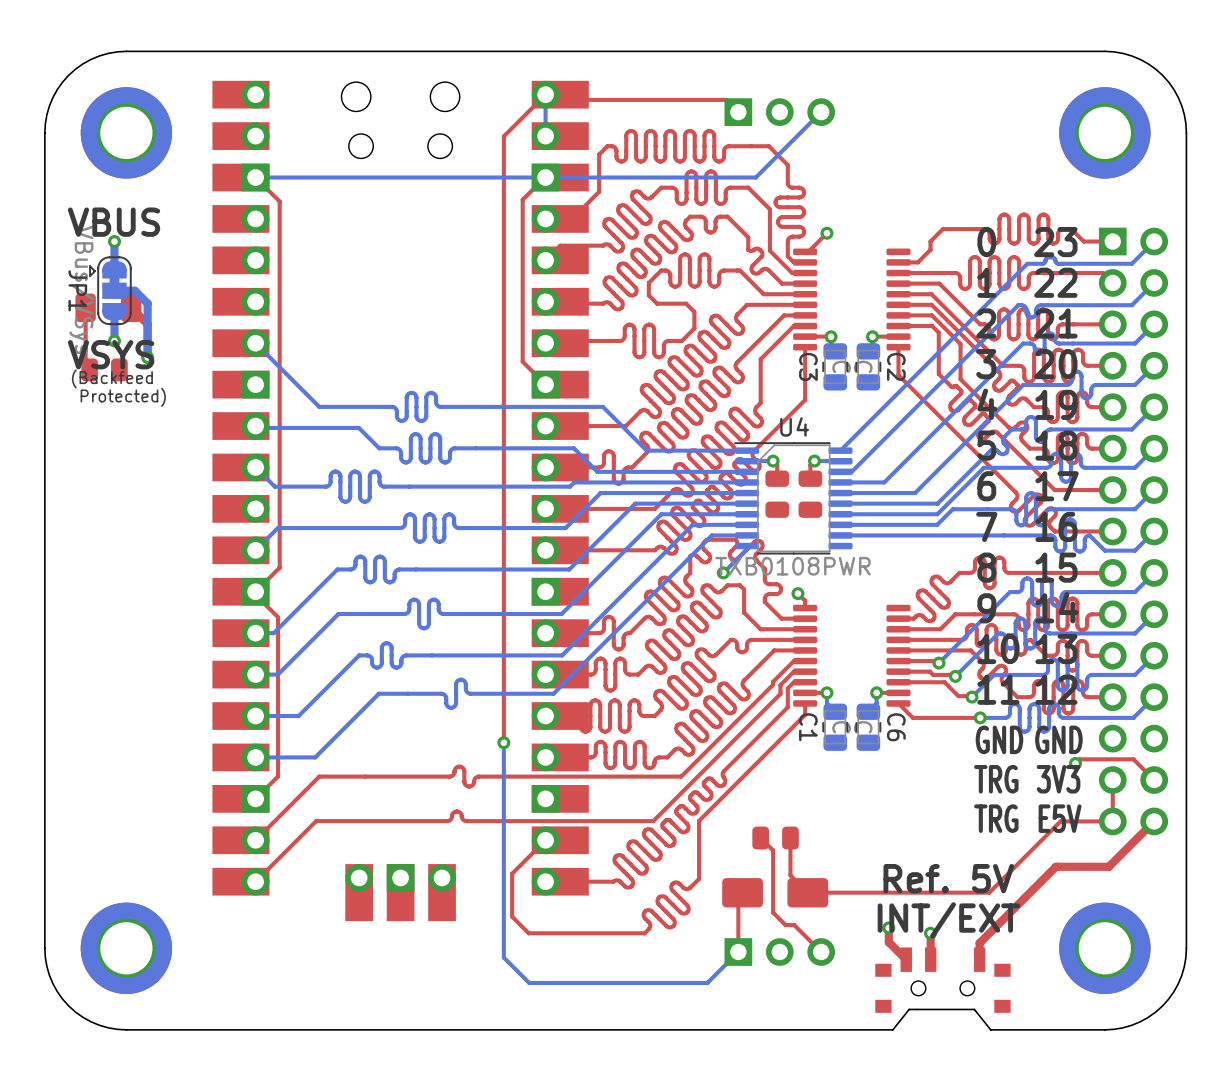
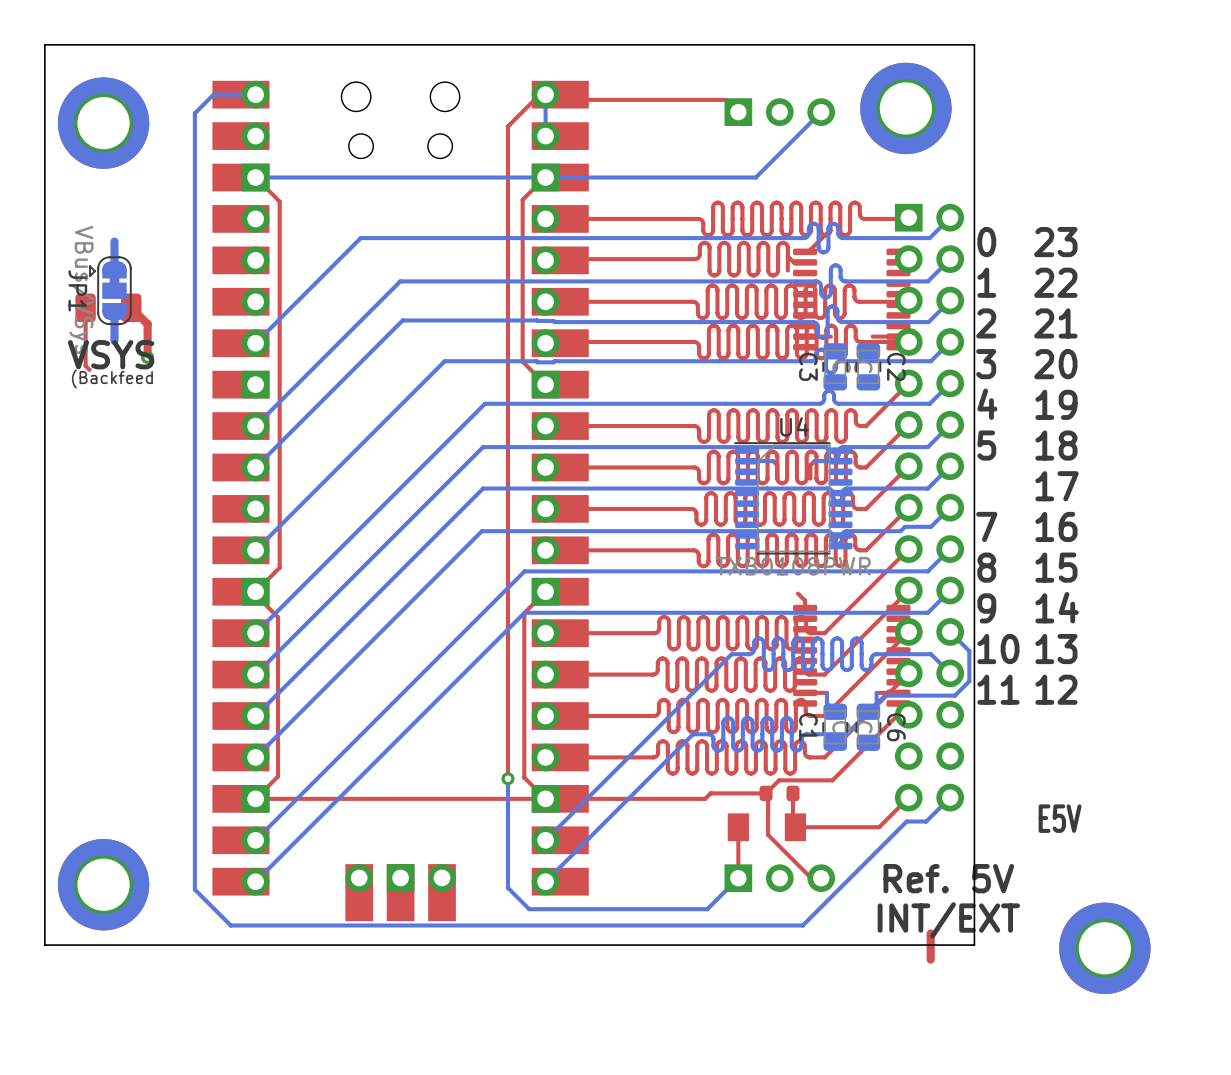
bottom track: none -> (255, 94) (213, 94) (194, 113) (194, 889) (230, 925) (802, 925) (906, 821) (926, 821) (950, 797)
top track: (545, 94) (503, 136) (503, 742) -> (545, 94) (539, 94) (508, 126) (508, 778)
board edge: (44, 132) (49, 105) (62, 82) (83, 63) (99, 55) (117, 51) (1104, 51) (1131, 55) (1155, 69) (1168, 82) (1178, 97) (1184, 114) (1186, 132) (1186, 948) (1184, 966) (1178, 983) (1162, 1005) (1140, 1021) (1114, 1029) (990, 1029) (974, 1009) (909, 1009) (892, 1029) (126, 1029) (108, 1027) (91, 1021) (68, 1005) (57, 991) (49, 975) (44, 945) -> (44, 132) (44, 44) (974, 44) (974, 945) (44, 945)
part position: (126, 132) -> (103, 123)
part position: (1104, 132) -> (905, 108)
top track: (572, 218) (599, 191) (599, 154) (607, 146) (612, 146) (616, 149) (617, 160) (621, 161) (625, 159) (626, 135) (628, 131) (632, 131) (635, 133) (636, 157) (640, 161) (645, 157) (647, 132) (651, 131) (655, 133) (655, 157) (660, 161) (665, 157) (665, 133) (669, 131) (672, 131) (675, 135) (675, 157) (680, 161) (684, 157) (685, 133) (691, 131) (694, 135) (694, 157) (699, 161) (704, 157) (704, 133) (710, 131) (714, 134) (714, 157) (717, 161) (723, 159) (724, 149) (727, 146) (768, 146) (787, 165) (788, 185) (791, 187) (801, 188) (804, 192) (800, 197) (779, 197) (775, 201) (778, 206) (799, 207) (803, 210) (801, 216) (782, 217) (778, 220) (781, 226) (799, 226) (803, 229) (801, 235) (789, 238) (787, 247) -> (572, 218) (699, 218) (702, 221) (703, 232) (708, 235) (713, 230) (713, 206) (718, 202) (722, 206) (723, 231) (728, 235) (732, 230) (732, 206) (738, 202) (742, 206) (742, 231) (747, 235) (752, 230) (752, 206) (757, 202) (761, 206) (762, 231) (767, 235) (771, 230) (771, 206) (777, 202) (781, 206) (781, 231) (787, 235) (791, 230) (791, 206) (796, 202) (801, 206) (801, 231) (806, 235) (810, 230) (811, 206) (815, 202) (820, 206) (820, 230) (825, 235) (830, 230) (830, 206) (835, 202) (840, 206) (840, 231) (845, 235) (849, 231) (850, 206) (853, 202) (859, 205) (860, 215) (863, 218) (908, 217)
text: VBUS (114, 222) -> none
via: (826, 233) -> none
via: (114, 241) -> none
top track: (1112, 241) (1083, 241) (1071, 229) (1063, 229) (1058, 232) (1057, 241) (1051, 243) (1048, 239) (1048, 218) (1043, 214) (1038, 218) (1038, 240) (1032, 243) (1028, 239) (1028, 218) (1023, 214) (1019, 218) (1018, 240) (1012, 243) (1009, 239) (1009, 218) (1003, 214) (999, 218) (999, 239) (996, 243) (990, 241) (989, 232) (986, 229) (942, 229) (930, 241) (930, 249) (917, 262) (898, 262) -> none
bottom track: (1154, 241) (1131, 263) (1058, 263) (1052, 257) (1047, 257) (1043, 263) (1027, 263) (840, 450) -> none
top track: (546, 259) (560, 245) (607, 244) (616, 251) (620, 251) (622, 244) (604, 226) (605, 220) (611, 219) (632, 237) (635, 236) (636, 231) (618, 212) (619, 206) (625, 205) (643, 223) (648, 223) (650, 220) (649, 216) (632, 198) (633, 192) (638, 191) (648, 198) (661, 187) (673, 187) (676, 191) (677, 201) (683, 203) (686, 199) (686, 175) (692, 171) (696, 175) (696, 200) (702, 203) (706, 199) (706, 175) (711, 171) (715, 175) (715, 199) (718, 203) (725, 201) (725, 191) (728, 188) (748, 187) (769, 209) (769, 250) (792, 273) (805, 273) -> (546, 259) (695, 259) (699, 256) (700, 245) (705, 242) (709, 247) (709, 271) (715, 275) (719, 271) (719, 246) (724, 242) (729, 247) (729, 271) (734, 275) (738, 271) (739, 246) (744, 242) (748, 247) (748, 271) (754, 275) (758, 271) (758, 246) (764, 242) (768, 247) (768, 271) (773, 275) (778, 271) (778, 245) (784, 243) (787, 247)
top track: (898, 273) (956, 273) (960, 276) (960, 286) (966, 288) (970, 284) (970, 260) (975, 257) (979, 261) (979, 285) (985, 288) (989, 284) (989, 260) (995, 257) (999, 261) (999, 285) (1004, 288) (1009, 284) (1009, 260) (1014, 257) (1018, 260) (1019, 284) (1022, 288) (1027, 287) (1029, 276) (1033, 273) (1102, 273) (1112, 282) -> none
bottom track: (1154, 282) (1131, 305) (1040, 305) (1036, 307) (1035, 315) (1031, 317) (1027, 314) (1025, 306) (1018, 305) (851, 471) (840, 471) -> none
top track: (805, 283) (782, 283) (766, 268) (757, 273) (753, 272) (751, 266) (761, 256) (762, 252) (757, 248) (751, 250) (748, 249) (748, 237) (727, 216) (716, 218) (715, 229) (710, 232) (706, 229) (703, 217) (690, 216) (684, 223) (691, 234) (688, 240) (684, 239) (667, 222) (663, 222) (660, 224) (660, 229) (675, 245) (673, 251) (668, 251) (653, 236) (646, 237) (646, 243) (659, 256) (658, 263) (652, 263) (639, 250) (633, 251) (632, 257) (645, 270) (643, 276) (638, 276) (625, 263) (619, 265) (619, 271) (636, 288) (634, 294) (628, 294) (611, 277) (605, 279) (605, 285) (622, 302) (620, 308) (615, 308) (607, 302) (547, 303) (545, 301) -> (908, 300) (858, 301) (854, 298) (853, 287) (848, 285) (844, 289) (844, 314) (839, 318) (835, 314) (834, 289) (830, 285) (825, 289) (825, 313) (820, 318) (815, 313) (815, 289) (810, 285) (805, 289) (805, 313) (800, 318) (795, 314) (795, 289) (790, 285) (786, 289) (785, 313) (781, 318) (776, 314) (776, 289) (771, 285) (766, 289) (766, 313) (762, 318) (756, 314) (756, 289) (752, 285) (747, 289) (746, 313) (742, 318) (737, 314) (737, 289) (732, 285) (727, 289) (727, 313) (723, 318) (717, 314) (717, 289) (713, 285) (707, 289) (707, 313) (703, 318) (698, 315) (697, 304) (693, 301) (545, 301)
top track: (898, 283) (939, 283) (980, 324) (987, 325) (989, 336) (993, 339) (998, 335) (999, 313) (1003, 309) (1008, 312) (1008, 335) (1013, 339) (1018, 335) (1018, 313) (1022, 309) (1028, 312) (1028, 335) (1032, 339) (1038, 335) (1038, 313) (1042, 309) (1047, 312) (1048, 335) (1051, 339) (1057, 336) (1058, 327) (1061, 324) (1112, 324) -> none
bottom track: (114, 290) (134, 290) (147, 303) (147, 357) -> none
top track: (805, 294) (763, 294) (739, 270) (721, 271) (719, 274) (718, 284) (712, 286) (709, 282) (709, 258) (705, 254) (699, 258) (699, 283) (693, 286) (689, 282) (689, 258) (684, 254) (680, 258) (680, 282) (678, 285) (671, 284) (669, 273) (666, 270) (661, 270) (648, 282) (648, 295) (657, 303) (686, 303) (694, 311) (694, 328) (681, 340) (665, 341) (661, 356) (657, 357) (654, 354) (654, 328) (649, 324) (644, 328) (644, 352) (640, 357) (634, 353) (634, 328) (630, 324) (625, 327) (624, 337) (621, 340) (546, 341) -> (908, 341) (859, 341) (855, 338) (855, 328) (850, 325) (846, 329) (845, 354) (841, 358) (836, 354) (835, 329) (831, 325) (826, 329) (826, 354) (821, 358) (816, 354) (816, 329) (811, 325) (806, 329) (806, 354) (801, 358) (797, 354) (796, 329) (792, 325) (787, 329) (787, 354) (782, 358) (777, 354) (777, 329) (773, 325) (767, 329) (767, 354) (763, 358) (758, 354) (757, 329) (753, 325) (748, 329) (748, 354) (743, 358) (738, 354) (738, 329) (734, 325) (728, 329) (728, 354) (724, 358) (718, 354) (718, 329) (714, 325) (709, 329) (708, 354) (704, 358) (699, 355) (698, 345) (694, 342) (546, 341)
top track: (898, 294) (931, 294) (1003, 365) (1022, 367) (1024, 378) (1027, 381) (1033, 378) (1034, 353) (1038, 349) (1043, 353) (1043, 377) (1047, 381) (1053, 378) (1053, 353) (1057, 349) (1063, 353) (1063, 377) (1067, 381) (1073, 378) (1073, 353) (1076, 350) (1082, 352) (1083, 362) (1086, 365) (1112, 365) -> none
top track: (805, 304) (747, 304) (736, 316) (743, 328) (738, 334) (735, 333) (718, 316) (713, 316) (711, 322) (728, 340) (728, 346) (722, 347) (706, 332) (701, 332) (699, 338) (714, 354) (714, 359) (708, 361) (693, 346) (687, 346) (686, 353) (701, 369) (700, 373) (696, 375) (676, 357) (671, 358) (669, 364) (686, 381) (687, 387) (680, 388) (663, 372) (657, 371) (656, 377) (672, 395) (673, 401) (667, 402) (649, 385) (644, 385) (642, 391) (659, 409) (659, 414) (654, 417) (646, 410) (642, 410) (625, 426) -> (908, 383) (866, 426) (857, 425) (854, 412) (847, 411) (846, 414) (845, 438) (841, 441) (836, 438) (836, 414) (831, 410) (826, 413) (826, 437) (822, 441) (816, 438) (816, 414) (812, 410) (807, 413) (806, 437) (802, 441) (797, 438) (797, 414) (792, 410) (787, 413) (787, 437) (783, 441) (777, 438) (777, 414) (773, 410) (767, 413) (767, 437) (763, 441) (758, 438) (757, 414) (753, 410) (748, 413) (748, 437) (743, 441) (738, 438) (738, 414) (734, 410) (728, 413) (728, 437) (724, 441) (718, 438) (718, 414) (714, 410) (709, 413) (708, 437) (704, 441) (699, 439) (699, 429) (695, 426) (625, 426)
top track: (898, 304) (931, 304) (999, 372) (999, 377) (994, 384) (995, 389) (1001, 390) (1011, 380) (1017, 385) (1017, 387) (1008, 398) (1010, 404) (1014, 404) (1021, 398) (1025, 398) (1034, 407) (1046, 408) (1048, 419) (1052, 422) (1057, 418) (1057, 396) (1061, 392) (1067, 395) (1067, 417) (1071, 421) (1077, 418) (1077, 396) (1080, 392) (1086, 394) (1087, 403) (1090, 406) (1112, 407) -> none
top track: (805, 315) (784, 315) (737, 362) (736, 368) (742, 376) (740, 381) (735, 381) (721, 367) (716, 368) (714, 374) (728, 388) (728, 394) (722, 395) (707, 382) (702, 382) (700, 388) (714, 402) (714, 408) (708, 409) (694, 395) (688, 396) (687, 402) (700, 416) (700, 422) (694, 423) (680, 409) (675, 409) (673, 416) (686, 430) (686, 435) (680, 437) (666, 423) (660, 423) (659, 430) (673, 445) (672, 450) (668, 451) (649, 433) (643, 433) (641, 438) (647, 446) (648, 450) (632, 467) -> (908, 424) (866, 467) (857, 466) (854, 453) (847, 452) (845, 455) (845, 479) (841, 483) (836, 479) (835, 455) (831, 451) (826, 455) (826, 479) (822, 483) (816, 479) (816, 455) (812, 451) (806, 455) (806, 479) (802, 483) (797, 479) (796, 455) (792, 451) (787, 455) (787, 479) (782, 483) (777, 479) (777, 455) (773, 451) (767, 455) (767, 479) (763, 483) (757, 479) (757, 455) (753, 451) (748, 455) (747, 479) (743, 483) (738, 479) (738, 455) (733, 451) (728, 455) (728, 479) (724, 483) (718, 479) (718, 455) (714, 451) (709, 455) (708, 479) (704, 483) (699, 480) (698, 471) (695, 467) (632, 467)
top track: (898, 315) (931, 315) (960, 344) (960, 379) (1009, 427) (1014, 428) (1021, 422) (1025, 423) (1027, 428) (1021, 435) (1021, 440) (1029, 448) (1046, 449) (1050, 462) (1054, 463) (1057, 460) (1057, 438) (1061, 434) (1067, 437) (1067, 459) (1071, 463) (1077, 459) (1077, 438) (1080, 434) (1086, 435) (1087, 445) (1090, 448) (1112, 448) -> none
bottom track: (1154, 324) (1135, 343) (1058, 343) (1055, 341) (1052, 334) (1049, 333) (1044, 336) (1044, 349) (1041, 353) (1036, 352) (1032, 344) (1023, 343) (884, 482) (840, 482) -> none
top track: (805, 326) (793, 326) (760, 359) (760, 403) (755, 410) (761, 419) (760, 424) (755, 426) (738, 409) (732, 409) (730, 415) (747, 432) (747, 438) (741, 439) (724, 423) (718, 423) (717, 429) (733, 446) (733, 452) (727, 453) (710, 437) (704, 437) (703, 443) (719, 460) (719, 465) (713, 467) (696, 451) (691, 450) (689, 457) (705, 473) (705, 479) (699, 481) (682, 464) (677, 464) (675, 471) (691, 487) (692, 492) (686, 495) (679, 489) (674, 489) (654, 508) -> (908, 466) (866, 508) (854, 507) (851, 495) (845, 494) (843, 497) (843, 521) (838, 524) (833, 521) (833, 497) (829, 493) (823, 496) (823, 520) (819, 524) (814, 521) (813, 497) (809, 493) (804, 496) (804, 520) (799, 524) (794, 521) (794, 497) (790, 493) (784, 496) (784, 520) (780, 524) (774, 521) (774, 497) (770, 493) (765, 496) (764, 520) (760, 524) (755, 521) (755, 497) (750, 493) (745, 496) (745, 520) (741, 524) (735, 521) (735, 497) (731, 493) (725, 496) (725, 520) (722, 524) (716, 521) (715, 497) (712, 493) (706, 496) (706, 520) (702, 524) (697, 522) (696, 512) (692, 509) (654, 508)
top track: (898, 326) (932, 326) (938, 332) (938, 374) (951, 386) (956, 386) (961, 391) (950, 403) (950, 407) (953, 410) (957, 410) (969, 399) (975, 406) (964, 417) (965, 423) (971, 424) (982, 413) (988, 418) (988, 420) (978, 431) (979, 437) (984, 438) (992, 431) (996, 432) (1054, 490) (1112, 490) -> none
via: (831, 336) -> none
via: (872, 336) -> none
via: (114, 340) -> none
bottom track: (255, 343) (319, 406) (392, 406) (396, 409) (397, 418) (401, 420) (406, 417) (406, 397) (410, 392) (416, 395) (416, 416) (420, 420) (425, 417) (426, 397) (430, 392) (435, 394) (436, 403) (440, 406) (602, 406) (646, 450) (747, 450) -> (255, 343) (360, 238) (803, 238) (808, 235) (809, 225) (813, 223) (818, 227) (819, 249) (823, 252) (828, 248) (828, 228) (832, 223) (837, 225) (838, 235) (842, 238) (929, 238) (950, 217)
top track: (805, 347) (805, 400) (753, 452) (753, 456) (759, 464) (758, 468) (752, 470) (741, 459) (738, 459) (734, 465) (745, 477) (744, 483) (738, 484) (725, 472) (720, 479) (731, 490) (730, 497) (724, 497) (712, 486) (706, 491) (717, 505) (716, 510) (710, 511) (698, 500) (692, 505) (703, 519) (701, 525) (696, 525) (679, 508) (673, 508) (672, 515) (689, 532) (690, 537) (683, 539) (666, 522) (661, 521) (658, 524) (658, 528) (675, 545) (676, 550) (671, 553) (661, 546) (654, 550) -> (908, 507) (866, 550) (857, 549) (854, 536) (847, 535) (845, 538) (845, 562) (841, 566) (835, 562) (835, 538) (831, 534) (826, 538) (825, 561) (821, 566) (816, 562) (816, 538) (811, 534) (806, 538) (806, 561) (802, 566) (796, 562) (796, 538) (792, 534) (786, 538) (786, 561) (782, 566) (777, 562) (776, 538) (772, 534) (767, 538) (767, 561) (762, 566) (757, 562) (757, 538) (753, 534) (747, 538) (747, 561) (743, 566) (738, 562) (737, 538) (733, 534) (728, 538) (728, 561) (724, 565) (718, 562) (718, 538) (714, 534) (708, 538) (708, 561) (704, 565) (699, 563) (698, 553) (695, 550) (654, 550)
top track: (898, 347) (898, 375) (1016, 493) (1016, 498) (1010, 505) (1012, 510) (1018, 511) (1035, 494) (1041, 496) (1041, 501) (1025, 518) (1026, 524) (1032, 524) (1047, 509) (1051, 508) (1055, 513) (1049, 524) (1054, 531) (1112, 531) -> none
bottom track: (1154, 365) (1135, 384) (1094, 385) (1091, 387) (1090, 395) (1087, 398) (1081, 395) (1081, 375) (1077, 371) (1072, 373) (1071, 381) (1068, 384) (1023, 384) (915, 493) (840, 493) -> none
part: (104, 369) -> none
text: Protected) (123, 397) -> none
bottom track: (1154, 407) (1131, 429) (1050, 429) (1046, 431) (1045, 439) (1041, 441) (1036, 438) (1035, 419) (1029, 417) (1024, 428) (1011, 429) (1003, 437) (1003, 442) (1007, 448) (1006, 452) (1002, 454) (995, 449) (990, 450) (937, 503) (840, 503) -> none
bottom track: (255, 426) (257, 427) (358, 427) (379, 448) (399, 449) (401, 459) (405, 462) (410, 459) (411, 437) (415, 434) (420, 437) (420, 459) (424, 462) (428, 461) (430, 437) (435, 434) (440, 437) (440, 458) (444, 462) (448, 460) (450, 451) (454, 448) (573, 448) (597, 471) (747, 471) -> (255, 426) (400, 281) (816, 281) (820, 283) (821, 294) (825, 297) (830, 293) (830, 269) (834, 265) (839, 267) (840, 278) (844, 281) (927, 281) (950, 259)
bottom track: (1154, 448) (1135, 467) (1084, 467) (1081, 464) (1079, 455) (1073, 454) (1071, 458) (1070, 478) (1066, 481) (1061, 478) (1061, 458) (1056, 453) (1052, 455) (1051, 464) (1047, 467) (983, 467) (937, 514) (840, 514) -> none
via: (773, 461) -> none
via: (814, 461) -> none
bottom track: (255, 467) (274, 486) (327, 486) (330, 483) (331, 473) (337, 471) (340, 475) (340, 498) (345, 501) (350, 497) (350, 475) (355, 471) (359, 475) (360, 497) (364, 501) (369, 498) (369, 475) (374, 471) (378, 473) (379, 483) (384, 486) (570, 486) (574, 482) (747, 482) -> (255, 467) (402, 320) (812, 322) (817, 324) (818, 334) (822, 337) (827, 334) (827, 310) (831, 306) (836, 308) (837, 319) (841, 322) (928, 322) (950, 300)
top track: (628, 467) (624, 469) (623, 480) (618, 483) (613, 480) (613, 455) (611, 452) (605, 453) (603, 464) (599, 467) -> (628, 467) (599, 467)
text: 6 (986, 486) -> none
bottom track: (1154, 490) (1135, 509) (1049, 509) (1045, 512) (1045, 522) (1041, 525) (1036, 521) (1035, 497) (1031, 493) (1026, 496) (1026, 521) (1021, 525) (1017, 522) (1016, 512) (1011, 509) (952, 509) (937, 524) (840, 524) -> none
bottom track: (747, 493) (600, 493) (565, 528) (458, 528) (454, 525) (453, 516) (448, 514) (444, 518) (444, 538) (440, 541) (434, 538) (434, 518) (430, 514) (425, 517) (424, 537) (420, 541) (415, 538) (414, 518) (410, 514) (406, 516) (404, 525) (400, 528) (277, 528) -> (950, 341) (930, 361) (840, 361) (836, 363) (834, 370) (830, 372) (826, 369) (825, 352) (821, 349) (817, 351) (815, 358) (811, 361) (444, 361) (277, 528)
part: (777, 494) -> none
part: (810, 494) -> none
bottom track: (747, 503) (635, 503) (569, 569) (398, 569) (395, 572) (393, 580) (389, 582) (385, 578) (384, 559) (379, 556) (375, 560) (374, 579) (370, 582) (365, 578) (364, 559) (359, 556) (355, 559) (354, 568) (337, 569) (273, 633) (255, 633) -> (950, 383) (929, 403) (838, 403) (834, 400) (832, 392) (829, 390) (825, 392) (823, 401) (819, 403) (485, 403) (255, 633)
bottom track: (747, 514) (661, 514) (561, 614) (442, 613) (439, 610) (438, 602) (433, 599) (429, 603) (428, 624) (424, 628) (419, 625) (419, 603) (414, 599) (410, 601) (408, 610) (405, 613) (338, 614) (277, 674) (255, 674) -> (950, 424) (927, 447) (842, 447) (838, 450) (837, 458) (833, 459) (829, 457) (827, 449) (823, 447) (483, 447) (255, 674)
bottom track: (747, 524) (692, 524) (562, 655) (405, 655) (402, 657) (400, 665) (395, 667) (391, 664) (391, 646) (386, 643) (382, 646) (381, 663) (379, 666) (373, 666) (369, 656) (359, 655) (298, 716) (255, 716) -> (950, 466) (927, 488) (846, 488) (842, 491) (841, 499) (837, 501) (833, 499) (831, 490) (827, 488) (483, 488) (255, 716)
part position: (1133, 531) -> (929, 507)
bottom track: (1154, 531) (1135, 550) (1104, 550) (1089, 535) (1085, 538) (1084, 549) (1079, 551) (1075, 547) (1074, 523) (1070, 519) (1065, 522) (1065, 547) (1060, 551) (1056, 549) (1055, 538) (1051, 535) (840, 535) -> none
bottom track: (747, 535) (711, 535) (553, 693) (470, 693) (466, 690) (464, 681) (460, 679) (456, 683) (455, 704) (451, 707) (446, 705) (445, 696) (442, 693) (378, 693) (315, 757) (255, 757) -> (950, 507) (931, 526) (905, 526) (900, 531) (846, 531) (842, 534) (840, 542) (837, 544) (832, 541) (831, 533) (827, 531) (481, 531) (255, 757)
bottom track: (747, 546) (747, 549) (723, 572) -> none
bottom track: none -> (950, 549) (927, 571) (524, 571) (255, 840)
via: (723, 572) -> none
top track: (1112, 572) (1008, 572) (1004, 569) (1003, 560) (998, 557) (994, 561) (994, 584) (989, 588) (984, 583) (984, 560) (978, 557) (975, 560) (974, 569) (971, 572) (959, 572) (947, 583) (937, 576) (932, 578) (932, 584) (948, 600) (946, 607) (941, 606) (924, 590) (918, 592) (918, 597) (934, 614) (932, 620) (928, 620) (919, 614) (913, 618) (898, 618) -> none
bottom track: (1154, 572) (1135, 592) (1065, 592) (1061, 595) (1060, 603) (1056, 605) (1051, 602) (1051, 582) (1049, 579) (1045, 578) (1042, 581) (1041, 602) (1037, 605) (1032, 602) (1031, 581) (1025, 578) (1022, 581) (1020, 590) (1009, 592) (938, 663) -> none
bottom track: none -> (950, 590) (927, 612) (524, 612) (255, 881)
top track: none -> (545, 591) (524, 613) (524, 777) (545, 798)
via: (797, 593) -> none
top track: (1112, 614) (1090, 614) (1087, 617) (1086, 627) (1080, 629) (1077, 625) (1077, 602) (1071, 598) (1067, 602) (1067, 626) (1061, 629) (1057, 625) (1057, 602) (1051, 598) (1048, 602) (1047, 626) (1042, 630) (1038, 625) (1038, 602) (1032, 598) (1028, 602) (1028, 625) (1024, 629) (1019, 628) (1018, 617) (1013, 614) (955, 614) (940, 629) (898, 629) -> none
bottom track: (1154, 614) (1135, 633) (1049, 633) (1045, 630) (1043, 620) (1038, 618) (1035, 622) (1035, 644) (1030, 648) (1025, 644) (1025, 621) (1019, 618) (1015, 622) (1014, 647) (1007, 647) (1004, 635) (998, 633) (955, 676) -> none
top track: (805, 618) (781, 618) (764, 601) (766, 595) (778, 593) (781, 588) (778, 584) (768, 584) (765, 581) (764, 568) (755, 557) (762, 547) (760, 541) (755, 541) (734, 559) (730, 557) (729, 554) (736, 545) (735, 539) (706, 539) (702, 546) (709, 555) (708, 560) (703, 561) (694, 555) (690, 556) (690, 572) (685, 580) (692, 589) (691, 594) (685, 595) (667, 578) (661, 578) (660, 584) (677, 602) (678, 607) (671, 609) (653, 592) (648, 591) (646, 598) (663, 616) (664, 621) (658, 624) (651, 617) (646, 617) (630, 633) -> (908, 549) (824, 633) (808, 632) (805, 618) (798, 618) (796, 621) (796, 645) (792, 649) (786, 645) (786, 621) (782, 617) (776, 620) (776, 645) (772, 649) (767, 645) (766, 621) (762, 617) (757, 620) (757, 645) (752, 649) (747, 645) (747, 621) (743, 617) (737, 620) (737, 645) (733, 649) (727, 645) (727, 621) (723, 617) (718, 620) (717, 645) (713, 649) (708, 645) (708, 621) (703, 617) (698, 620) (698, 645) (694, 649) (688, 645) (688, 621) (684, 617) (678, 620) (678, 645) (675, 649) (669, 645) (669, 621) (666, 617) (659, 619) (659, 629) (656, 632) (630, 633)
top track: (805, 629) (760, 629) (744, 612) (744, 589) (739, 585) (727, 585) (718, 592) (706, 585) (702, 587) (702, 592) (719, 609) (719, 615) (713, 617) (699, 603) (693, 603) (692, 609) (706, 623) (705, 629) (699, 630) (685, 617) (680, 617) (678, 623) (692, 637) (692, 643) (686, 644) (671, 630) (666, 630) (664, 637) (678, 651) (678, 656) (672, 658) (654, 641) (649, 640) (647, 647) (664, 664) (665, 669) (659, 672) (648, 665) (638, 674) -> (908, 590) (824, 674) (807, 673) (803, 660) (796, 659) (794, 662) (794, 686) (791, 690) (785, 687) (784, 662) (780, 658) (775, 662) (775, 686) (770, 690) (765, 687) (765, 662) (761, 658) (755, 662) (755, 686) (751, 690) (746, 687) (745, 662) (741, 658) (736, 662) (736, 686) (731, 690) (726, 687) (726, 662) (722, 658) (716, 662) (716, 686) (712, 690) (706, 687) (706, 662) (703, 658) (697, 662) (696, 686) (693, 690) (687, 687) (687, 662) (683, 658) (677, 662) (677, 686) (674, 690) (670, 690) (667, 687) (667, 662) (664, 658) (658, 660) (657, 670) (655, 673) (638, 674)
bottom track: none -> (950, 631) (969, 651) (969, 681) (955, 695) (885, 695) (846, 734) (805, 734) (801, 737) (801, 747) (797, 750) (791, 746) (791, 722) (788, 718) (782, 721) (781, 746) (777, 750) (772, 746) (770, 719) (766, 718) (762, 721) (762, 746) (757, 750) (752, 746) (752, 721) (748, 718) (745, 718) (742, 722) (742, 746) (737, 750) (733, 746) (732, 721) (726, 718) (723, 722) (721, 749) (718, 750) (714, 748) (711, 734) (693, 734) (545, 881)
top track: (628, 633) (623, 636) (622, 647) (618, 649) (613, 645) (613, 621) (611, 617) (605, 618) (603, 630) (599, 633) -> (628, 633) (599, 633)
top track: (805, 639) (751, 639) (747, 642) (746, 650) (742, 652) (737, 649) (735, 641) (731, 639) (713, 656) (703, 649) (699, 649) (696, 652) (697, 656) (713, 673) (713, 678) (707, 680) (690, 664) (685, 663) (683, 670) (699, 687) (700, 692) (693, 694) (676, 677) (671, 677) (669, 684) (685, 700) (686, 706) (680, 708) (662, 691) (658, 690) (655, 696) (661, 707) (654, 716) -> (908, 631) (824, 716) (808, 715) (804, 701) (797, 700) (795, 704) (795, 727) (792, 731) (786, 728) (786, 704) (781, 699) (776, 703) (776, 727) (772, 732) (766, 728) (766, 704) (762, 699) (756, 703) (756, 727) (752, 732) (747, 728) (746, 704) (742, 699) (737, 703) (737, 727) (732, 732) (727, 728) (727, 704) (723, 700) (717, 703) (717, 727) (714, 731) (708, 728) (707, 704) (704, 700) (698, 703) (698, 727) (694, 731) (688, 728) (688, 704) (685, 700) (681, 700) (678, 703) (678, 727) (676, 731) (671, 731) (668, 728) (668, 704) (666, 700) (659, 701) (658, 712) (654, 716)
top track: (898, 639) (963, 639) (966, 636) (967, 627) (972, 625) (976, 628) (977, 644) (983, 646) (986, 643) (986, 628) (992, 625) (996, 628) (996, 650) (999, 654) (1005, 651) (1006, 636) (1013, 635) (1015, 637) (1016, 651) (1020, 654) (1025, 652) (1026, 642) (1029, 640) (1046, 655) (1055, 654) (1058, 642) (1065, 641) (1067, 645) (1067, 666) (1071, 670) (1077, 666) (1077, 645) (1080, 641) (1086, 642) (1087, 652) (1090, 655) (1112, 655) -> none
top track: (805, 650) (774, 650) (743, 681) (743, 686) (748, 694) (745, 699) (740, 698) (726, 684) (720, 684) (719, 690) (734, 705) (734, 709) (732, 712) (728, 713) (712, 697) (706, 698) (705, 704) (720, 720) (720, 724) (716, 727) (713, 726) (698, 711) (692, 712) (691, 717) (706, 733) (705, 739) (699, 740) (683, 724) (676, 726) (677, 731) (693, 747) (690, 754) (687, 754) (680, 749) (676, 748) (667, 757) (656, 758) (653, 766) (648, 767) (644, 763) (644, 744) (638, 742) (634, 746) (634, 765) (629, 768) (625, 764) (624, 744) (619, 741) (615, 745) (614, 765) (609, 768) (605, 764) (605, 744) (600, 741) (596, 744) (595, 754) (590, 757) -> (908, 673) (824, 757) (807, 756) (803, 743) (797, 742) (795, 745) (795, 769) (791, 773) (785, 769) (785, 745) (781, 741) (775, 744) (775, 769) (771, 773) (765, 769) (765, 745) (761, 741) (756, 744) (755, 769) (751, 773) (746, 769) (746, 745) (741, 741) (736, 744) (736, 769) (732, 773) (726, 769) (726, 745) (722, 741) (716, 744) (716, 769) (712, 773) (707, 769) (707, 745) (702, 741) (697, 744) (697, 769) (693, 773) (687, 769) (687, 745) (683, 741) (677, 744) (677, 769) (673, 773) (668, 769) (667, 745) (663, 741) (658, 743) (657, 753) (654, 757) (590, 757)
top track: (898, 650) (970, 650) (983, 663) (979, 673) (981, 678) (986, 678) (999, 666) (1004, 667) (1006, 671) (1001, 677) (1002, 681) (1017, 697) (1031, 696) (1035, 682) (1041, 681) (1043, 685) (1043, 709) (1047, 713) (1053, 709) (1053, 685) (1057, 681) (1063, 684) (1063, 709) (1067, 713) (1073, 709) (1073, 685) (1076, 681) (1082, 683) (1083, 693) (1086, 696) (1112, 697) -> none
bottom track: (1154, 655) (1135, 674) (1090, 675) (1087, 678) (1086, 688) (1082, 690) (1077, 686) (1075, 660) (1071, 659) (1067, 662) (1067, 686) (1062, 690) (1057, 686) (1057, 662) (1051, 659) (1048, 662) (1047, 671) (1045, 674) (994, 674) (972, 697) -> none
top track: (805, 661) (793, 661) (773, 681) (773, 684) (681, 776) (479, 776) (474, 781) -> none
top track: (898, 661) (936, 661) (938, 663) -> none
via: (938, 663) -> none
top track: (805, 671) (793, 671) (780, 685) (780, 693) (653, 821) (466, 821) (457, 811) -> none
top track: (898, 671) (929, 671) (933, 674) (955, 676) -> none
bottom track: none -> (950, 673) (931, 654) (875, 654) (871, 657) (870, 668) (864, 669) (861, 665) (861, 641) (856, 638) (852, 641) (851, 665) (848, 669) (842, 667) (842, 642) (837, 638) (832, 641) (830, 668) (826, 670) (822, 667) (822, 642) (817, 638) (812, 642) (812, 667) (809, 669) (805, 669) (802, 665) (802, 641) (798, 638) (793, 642) (792, 667) (786, 669) (783, 665) (783, 641) (778, 638) (773, 642) (773, 666) (768, 670) (763, 665) (763, 641) (757, 638) (754, 641) (752, 652) (731, 654) (545, 840)
top track: (629, 674) (625, 671) (624, 661) (620, 658) (615, 662) (615, 686) (612, 689) (608, 690) (605, 686) (605, 662) (603, 659) (596, 660) (595, 671) (590, 674) -> (629, 674) (590, 674)
via: (955, 676) -> none
top track: (805, 682) (793, 682) (787, 688) (787, 707) (723, 771) (724, 784) -> none
top track: (898, 682) (944, 682) (958, 696) (972, 697) -> none
via: (826, 692) -> none
via: (876, 692) -> none
via: (972, 697) -> none
bottom track: (1154, 697) (1133, 717) (1063, 717) (1059, 714) (1057, 706) (1052, 704) (1049, 708) (1048, 728) (1044, 731) (1039, 728) (1039, 708) (1035, 704) (1029, 707) (1029, 727) (1025, 731) (1020, 728) (1019, 708) (1016, 704) (1010, 706) (1009, 714) (1006, 717) (980, 717) -> none
top track: (805, 703) (805, 714) (699, 820) (699, 878) (687, 888) (676, 882) (671, 886) (672, 890) (687, 906) (688, 910) (685, 913) (681, 912) (663, 896) (659, 896) (657, 900) (658, 904) (674, 920) (672, 926) (666, 926) (648, 910) (644, 911) (643, 915) (650, 926) (644, 933) (528, 933) (512, 916) (512, 873) (545, 840) -> none
top track: (898, 703) (912, 717) (980, 717) -> none
top track: none -> (908, 714) (898, 714) (832, 780) (779, 780) (766, 793) (711, 792) (705, 798) (255, 798)
top track: (644, 716) (639, 712) (638, 702) (631, 701) (629, 704) (629, 728) (624, 731) (619, 728) (619, 704) (616, 700) (610, 703) (609, 727) (606, 731) (603, 731) (600, 728) (600, 704) (597, 700) (593, 700) (590, 703) (590, 727) (588, 730) (581, 729) (580, 719) (575, 716) -> (644, 716) (575, 716)
via: (980, 717) -> none
text: GND (999, 739) -> none
text: GND (1058, 739) -> none
bottom track: (503, 742) (503, 957) (529, 982) (707, 982) (738, 952) -> none
via position: (503, 742) -> (508, 778)
top track: (1075, 763) (1079, 759) (1133, 759) (1154, 780) -> none
via: (1075, 763) -> none
top track: (454, 771) (458, 766) (463, 768) (464, 782) (466, 785) (471, 785) (474, 781) -> none
top track: (454, 771) (449, 776) (319, 776) (255, 840) -> none
bottom track: none -> (508, 778) (508, 887) (529, 909) (707, 909) (738, 878)
text: TRG (996, 779) -> none
text: 3V3 (1058, 779) -> none
top track: (1112, 780) (1112, 821) (1060, 821) (989, 892) (807, 892) -> none
top track: (723, 784) (718, 785) (709, 778) (704, 781) (704, 785) (711, 793) (710, 798) -> none
part: none -> (779, 793)
top track: none -> (768, 796) (768, 834) (811, 878) (821, 878)
top track: none -> (795, 796) (792, 798) (792, 824) (795, 827) (879, 827) (908, 797)
top track: (710, 798) (704, 799) (695, 792) (690, 795) (690, 799) (697, 807) (696, 812) -> none
top track: (456, 811) (447, 821) (316, 821) (255, 881) -> none
top track: (696, 812) (690, 813) (682, 805) (676, 809) (676, 813) (688, 825) (685, 831) (680, 831) (668, 819) (662, 823) (662, 827) (674, 839) (671, 845) (666, 845) (651, 829) (644, 830) (644, 836) (660, 852) (658, 859) (652, 858) (635, 841) (629, 843) (629, 849) (646, 866) (644, 873) (639, 872) (621, 855) (615, 856) (615, 862) (632, 880) (630, 887) (626, 887) (617, 880) (545, 881) -> none
text: TRG (996, 818) -> none
top track: (1154, 821) (1108, 866) (1055, 866) (979, 943) (979, 959) -> none
part footprint: [752, 826, 799, 850] -> [727, 813, 807, 842]
top track: none -> (738, 827) (738, 878)
top track: (760, 838) (773, 850) (773, 912) (785, 925) (794, 925) (821, 952) -> none
top track: (790, 838) (790, 875) (807, 892) -> none
part footprint: [722, 878, 829, 908] -> [724, 864, 836, 893]
top track: (742, 892) (738, 896) (738, 952) -> none
top track: (888, 927) (888, 942) (906, 959) -> none
via: (888, 927) -> none
via: (930, 933) -> none
part position: (126, 948) -> (103, 884)
part: (779, 952) -> none
part: (942, 980) -> none

